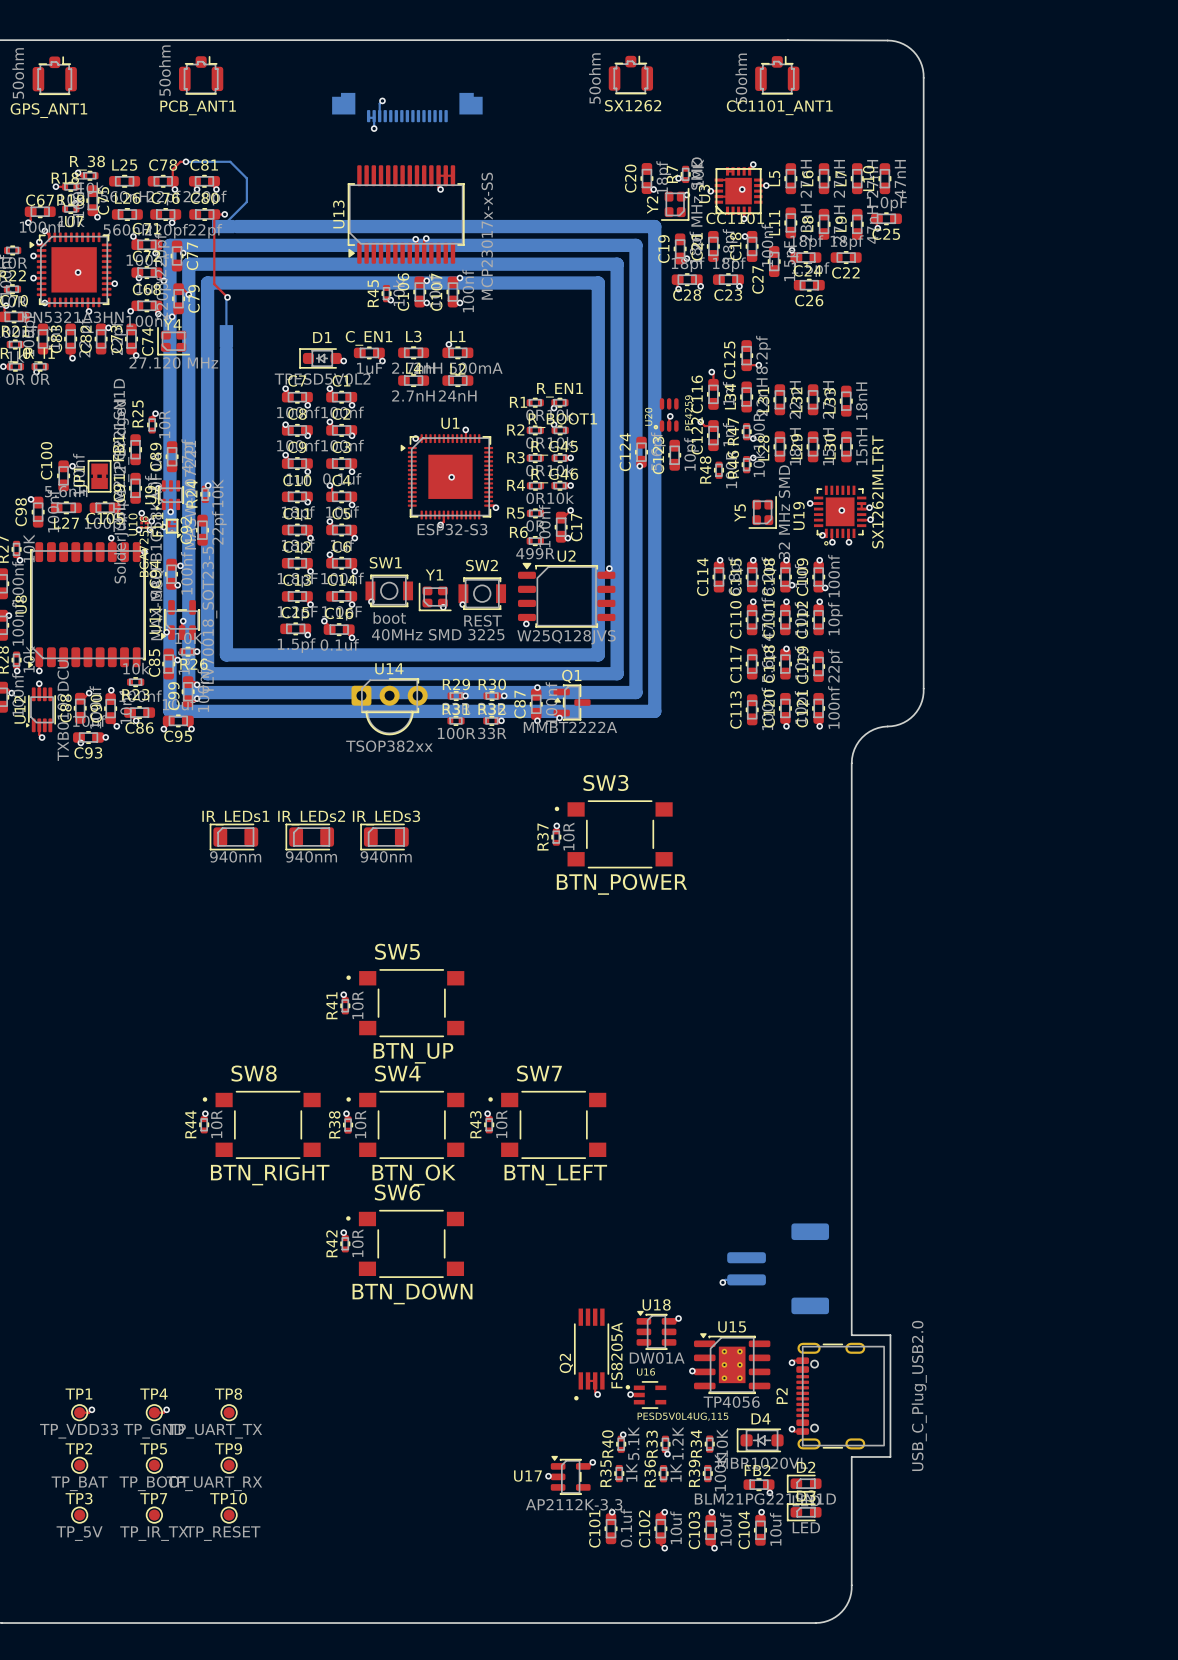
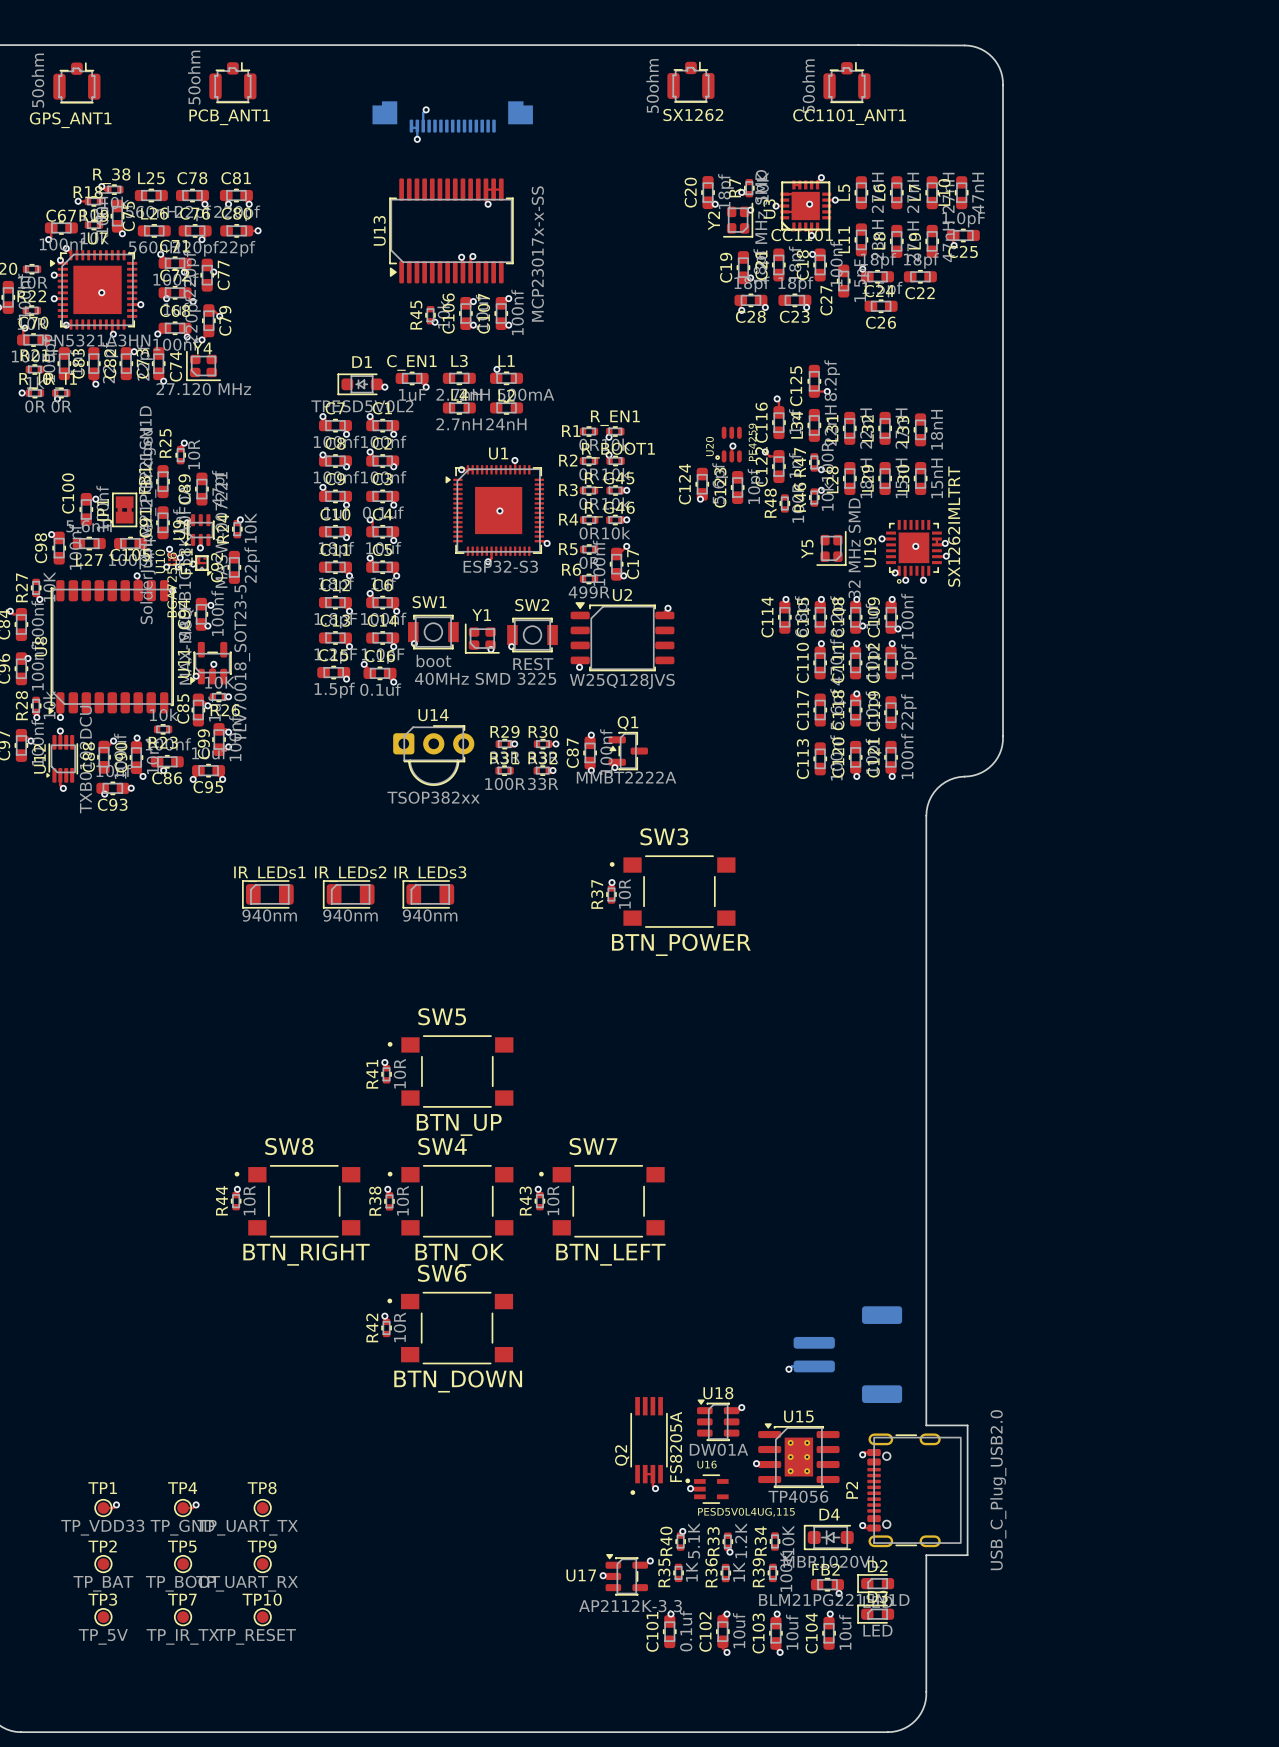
top track: (186, 161) (180, 161) (172, 169) (172, 181) -> none
bottom track: (186, 161) (230, 161) (246, 178) (246, 201) (223, 226) -> none
via: (186, 161) -> none
top track: (214, 214) (214, 284) (227, 297) -> none
bottom track: (227, 297) (226, 336) -> none
via: (227, 297) -> none
part: (412, 468) -> none

